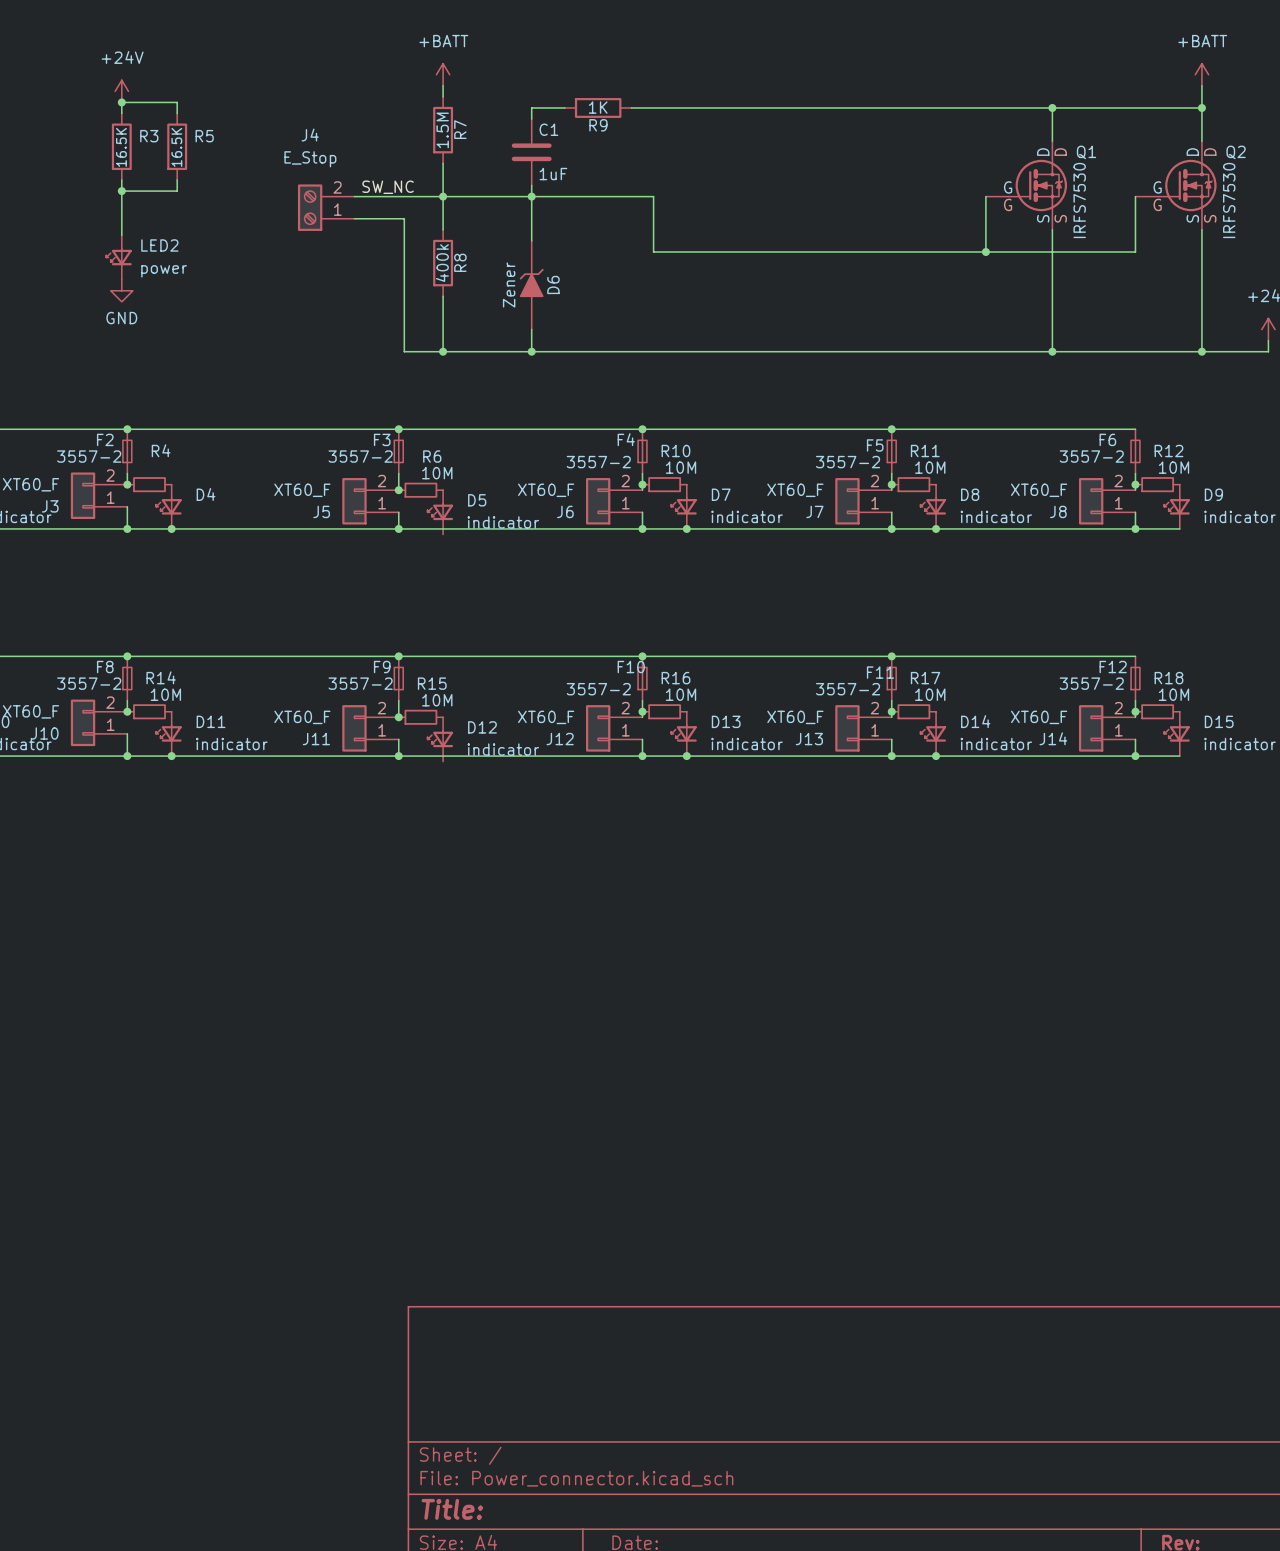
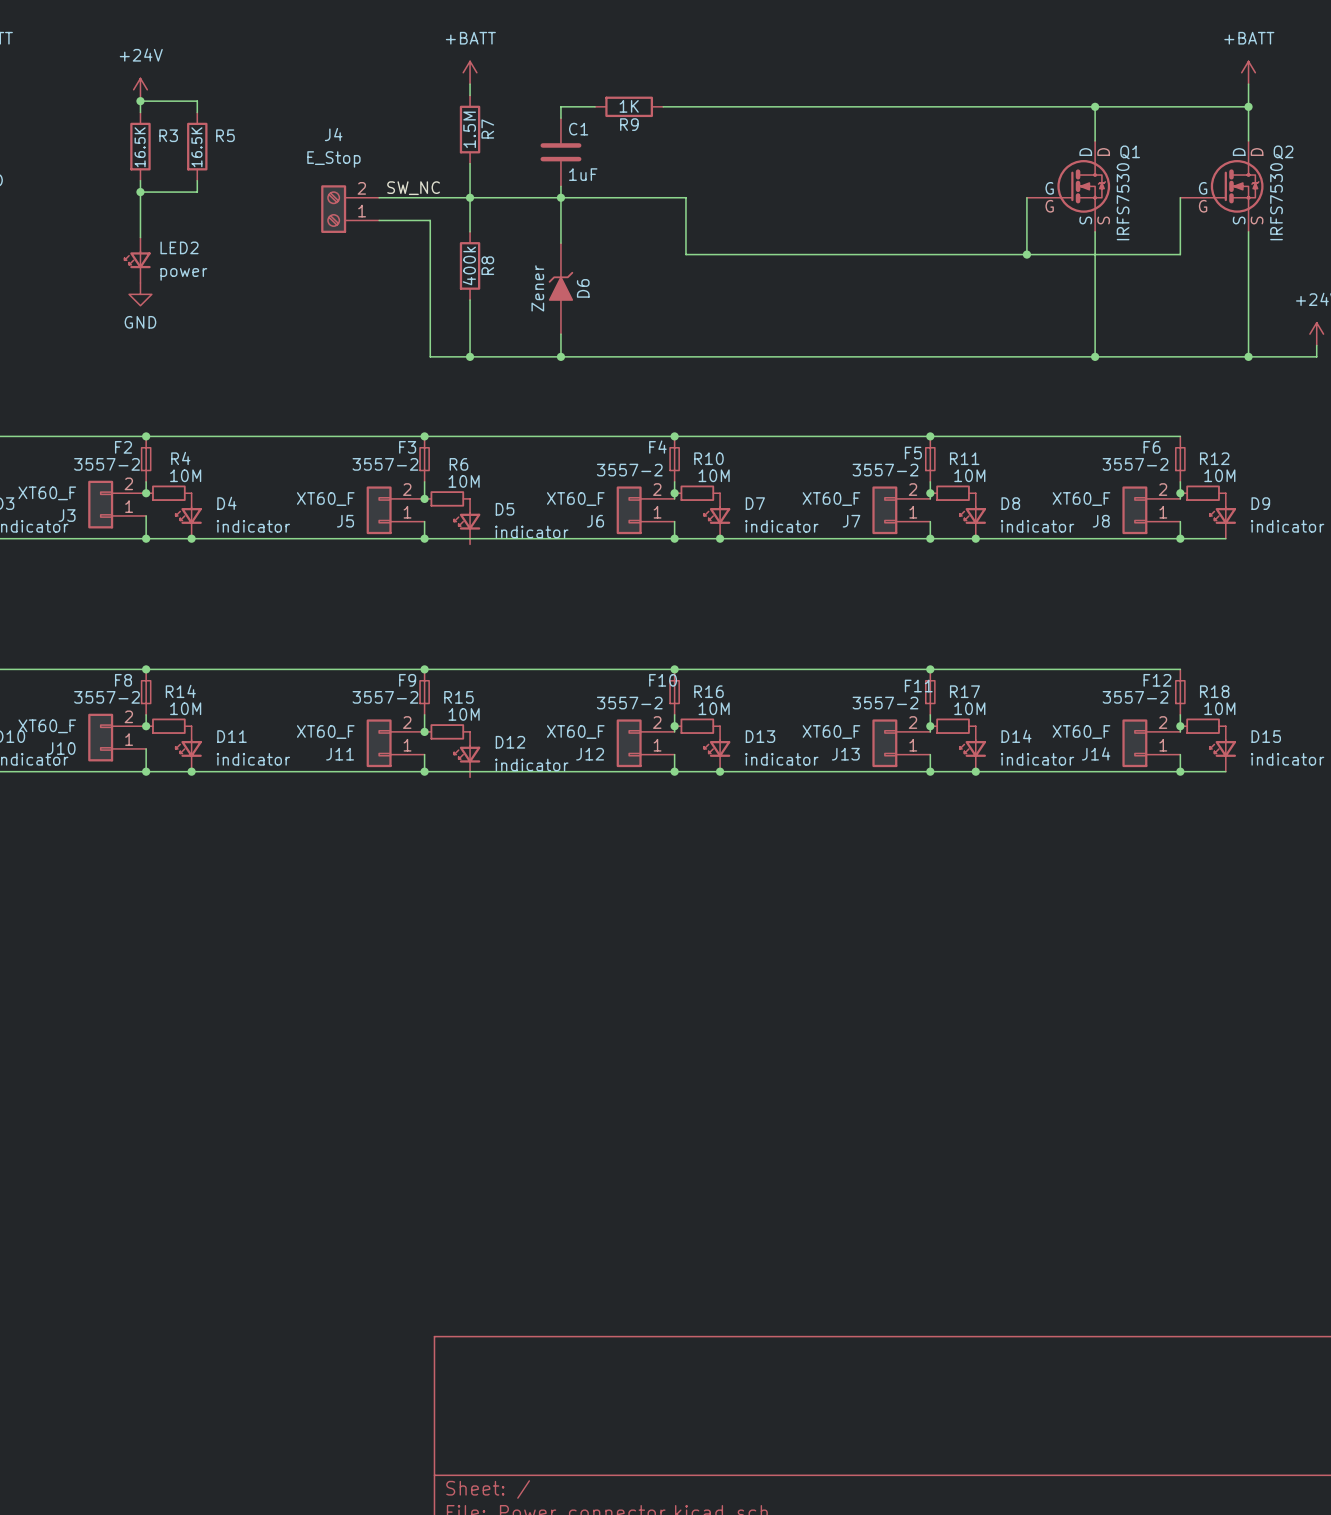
R4 value: none -> 10M (185, 475)
D4 value: none -> indicator (253, 526)

